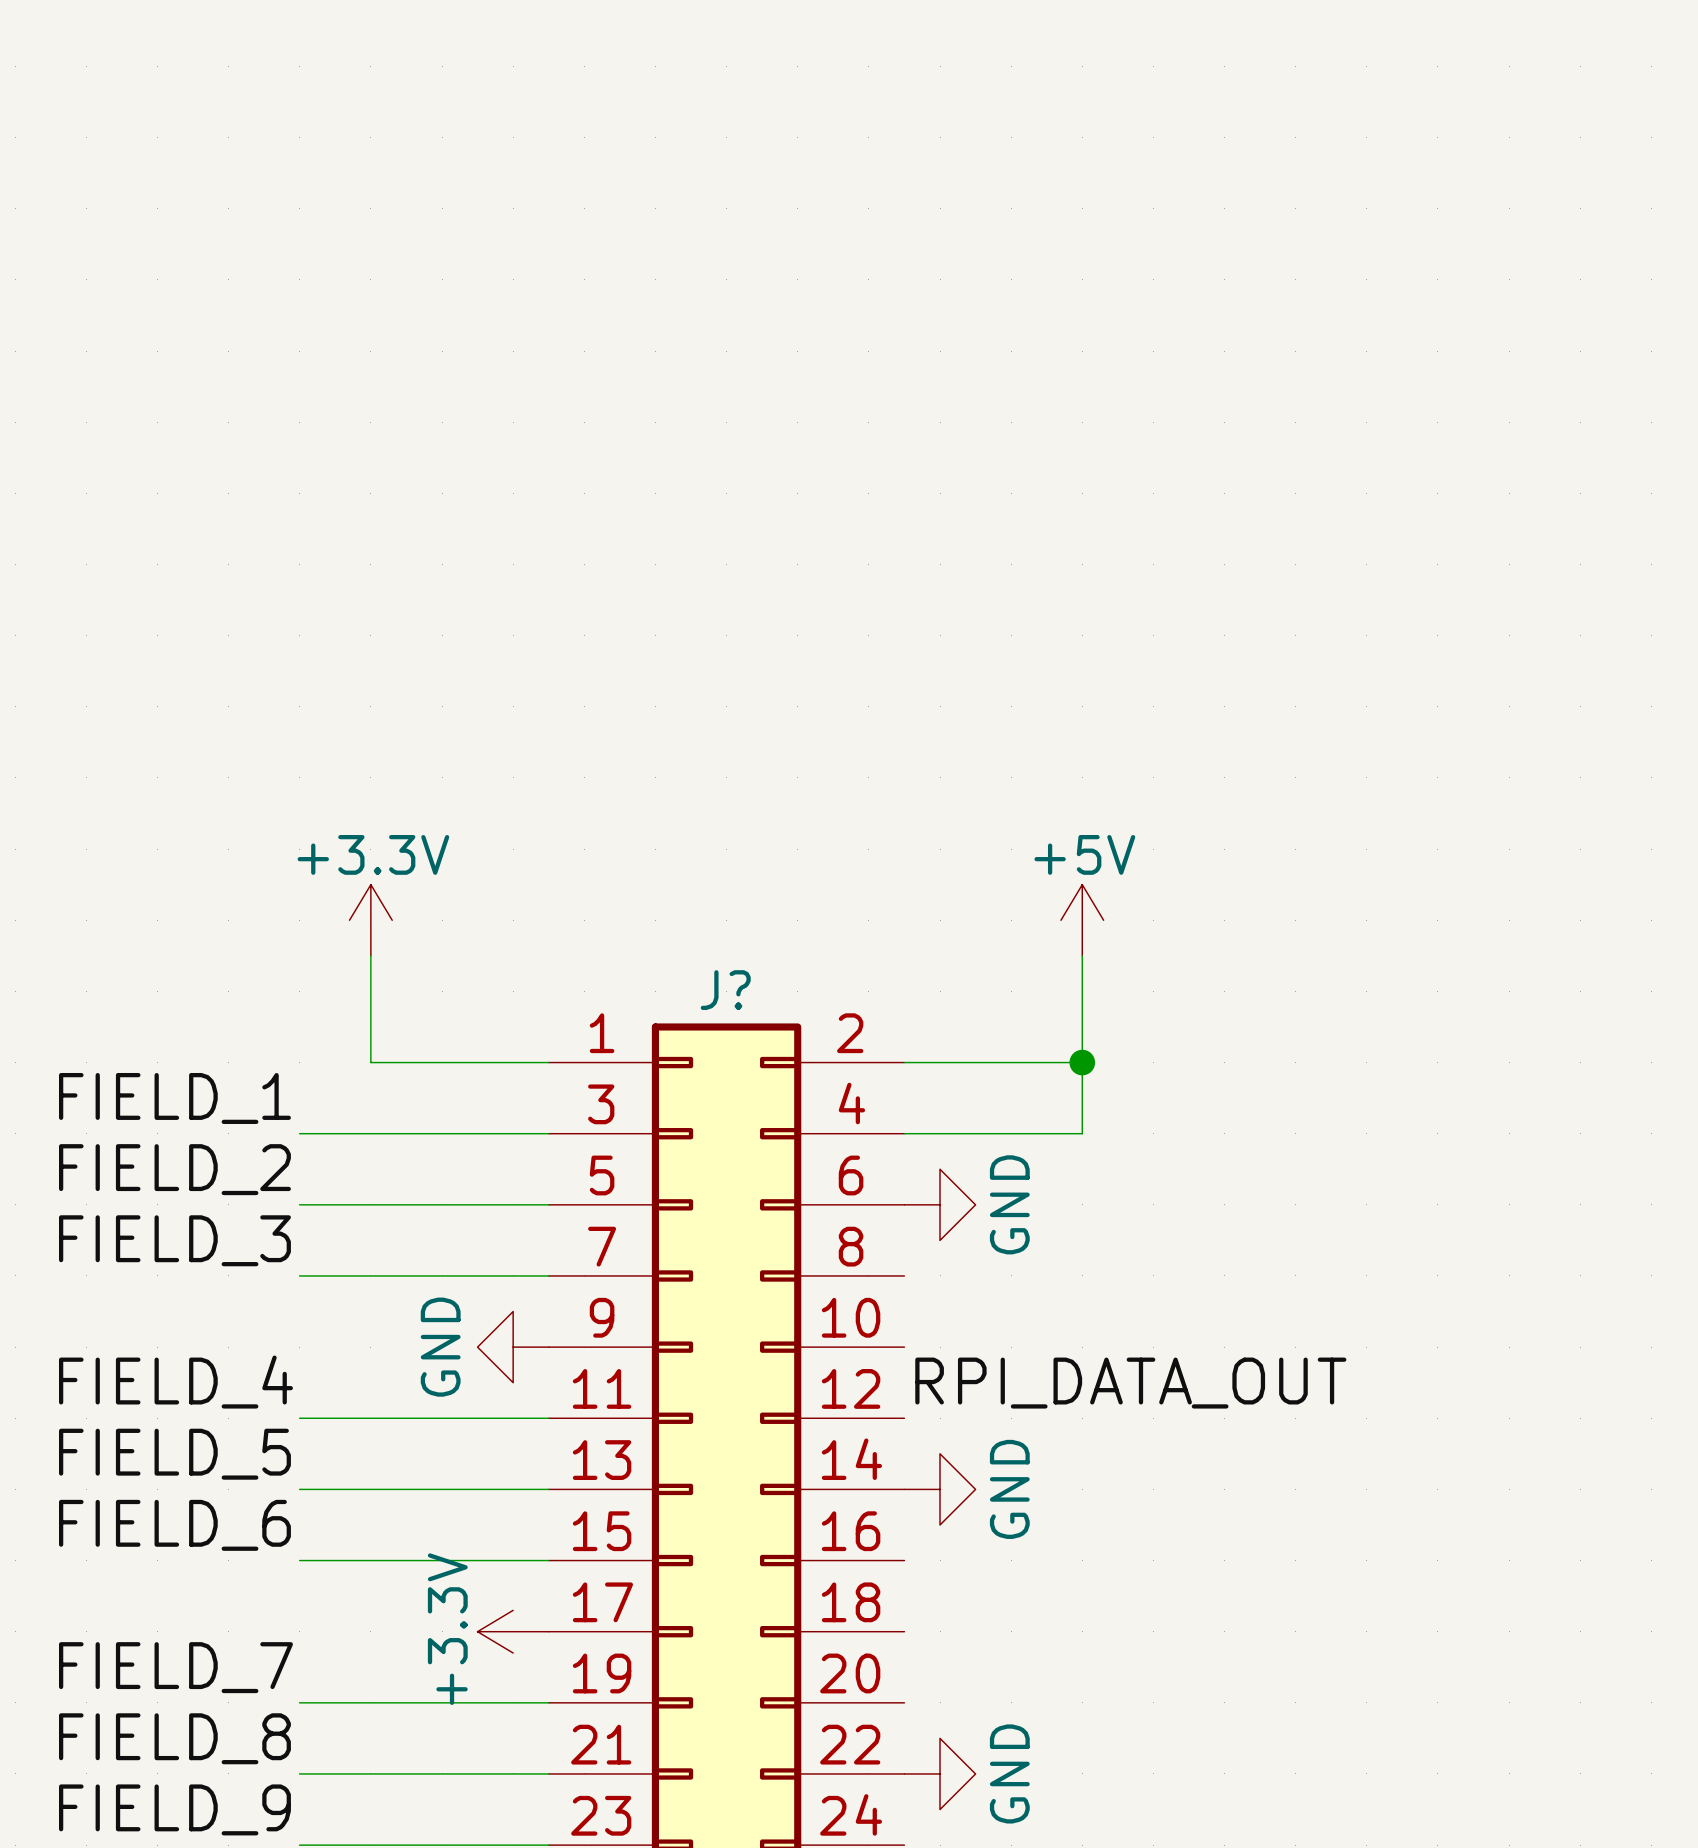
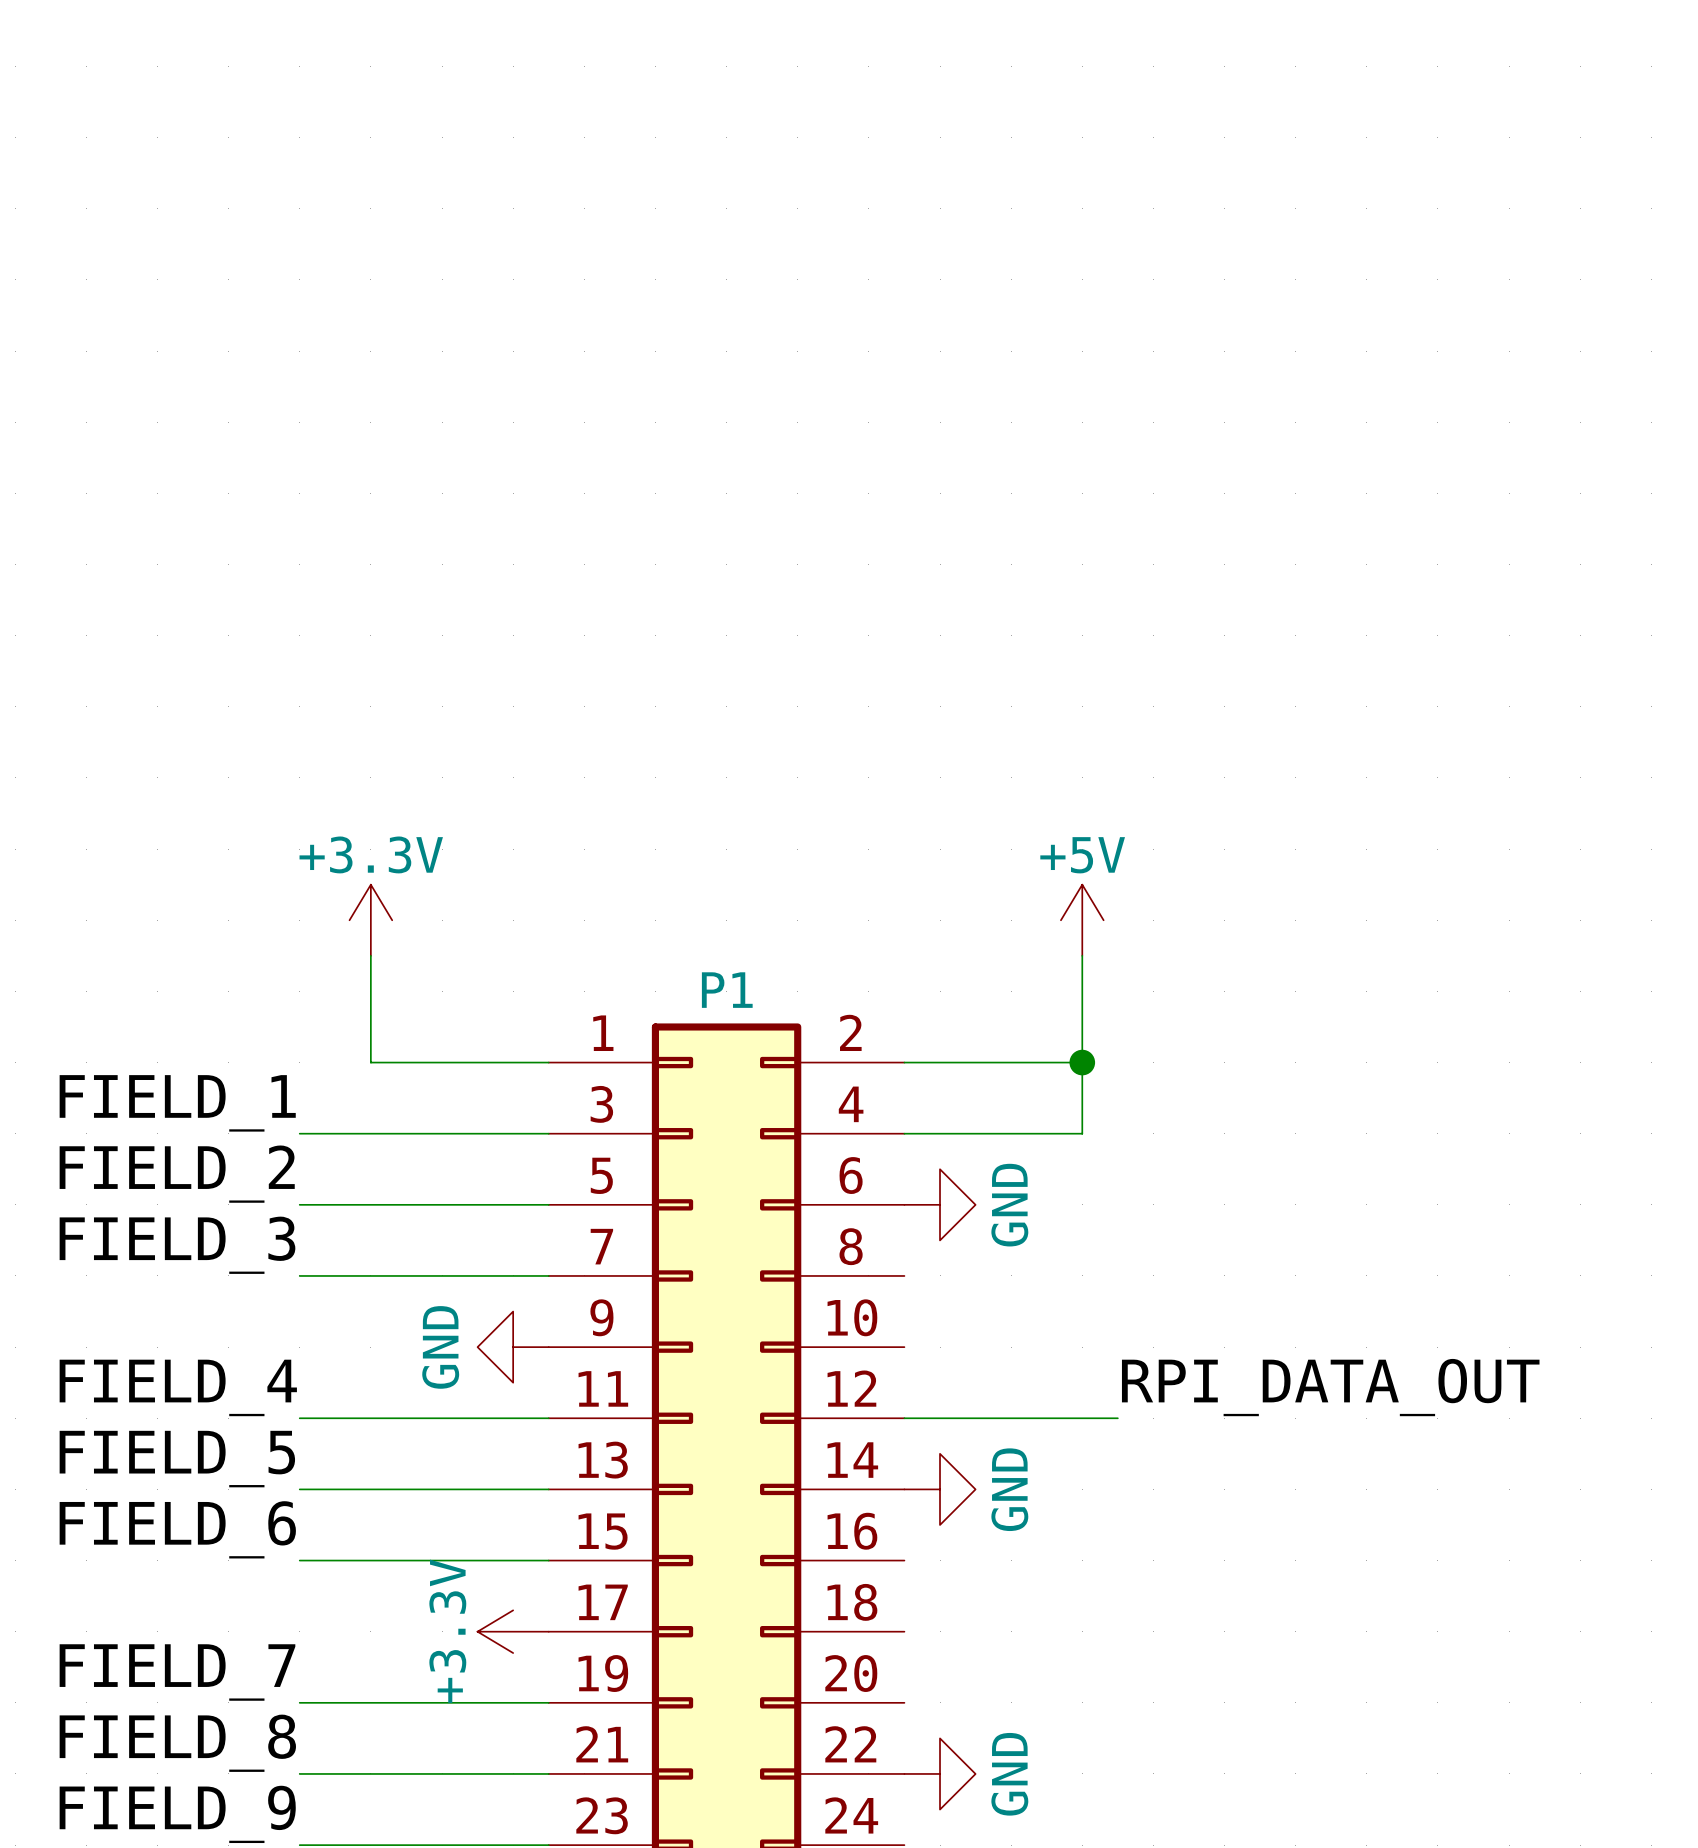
J? name: J? (725, 990) -> P1 (727, 990)
label position: RPI_DATA_OUT (1130, 1383) -> RPI_DATA_OUT (1330, 1387)
wire: none -> (904, 1418) (1117, 1418)

